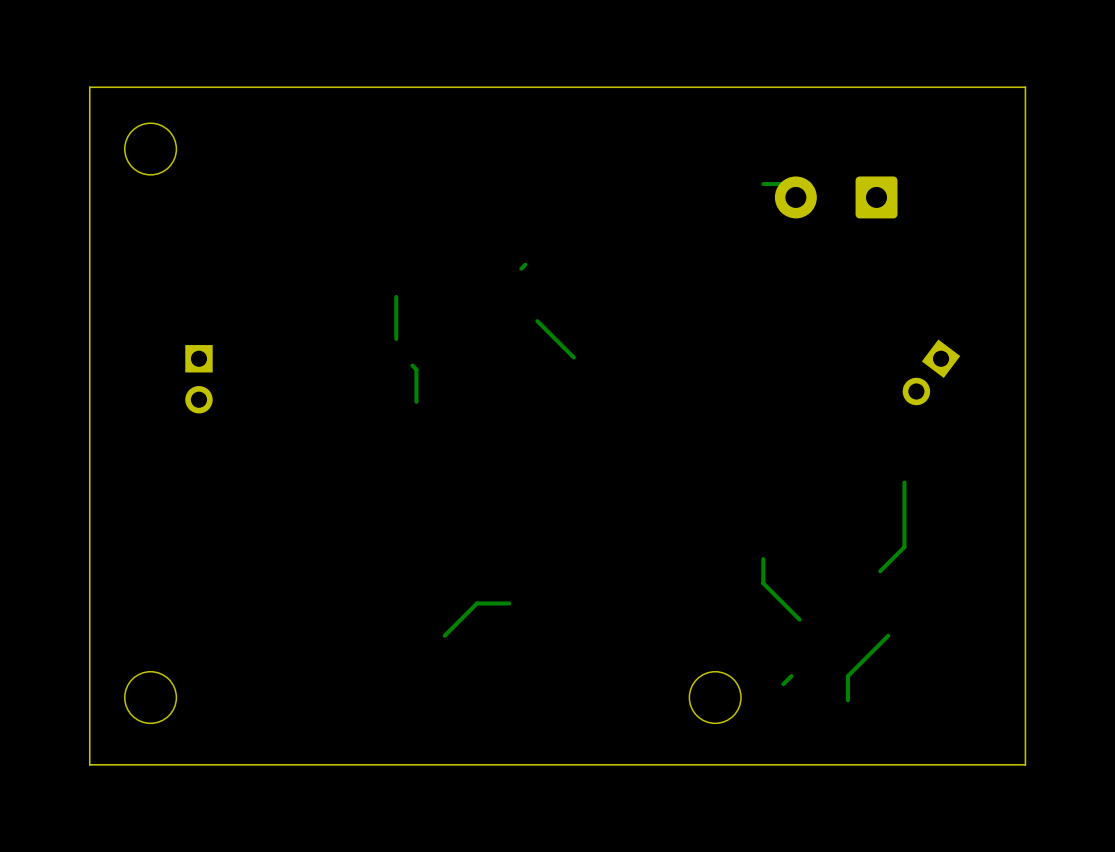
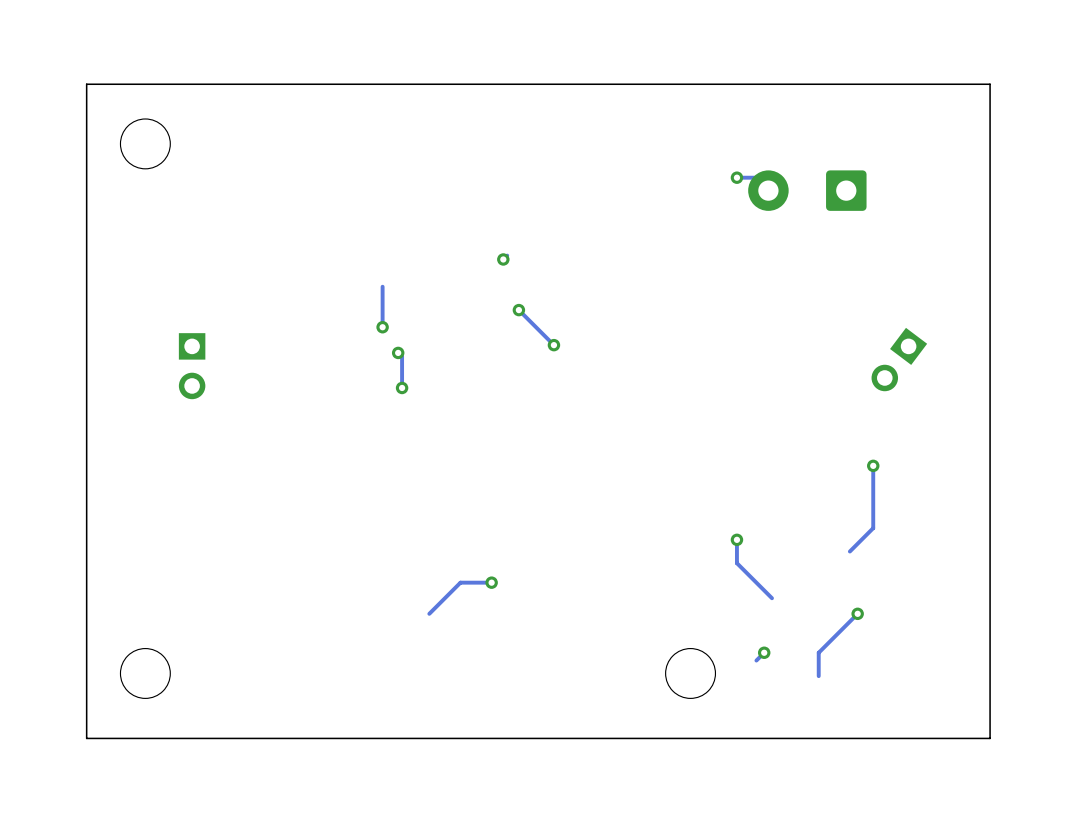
via: none -> (736, 177)
via: none -> (503, 259)
via: none -> (518, 310)
via: none -> (382, 327)
via: none -> (553, 345)
via: none -> (398, 352)
via: none -> (402, 387)
via: none -> (873, 465)
via: none -> (736, 539)
via: none -> (491, 582)
via: none -> (857, 613)
via: none -> (764, 652)

